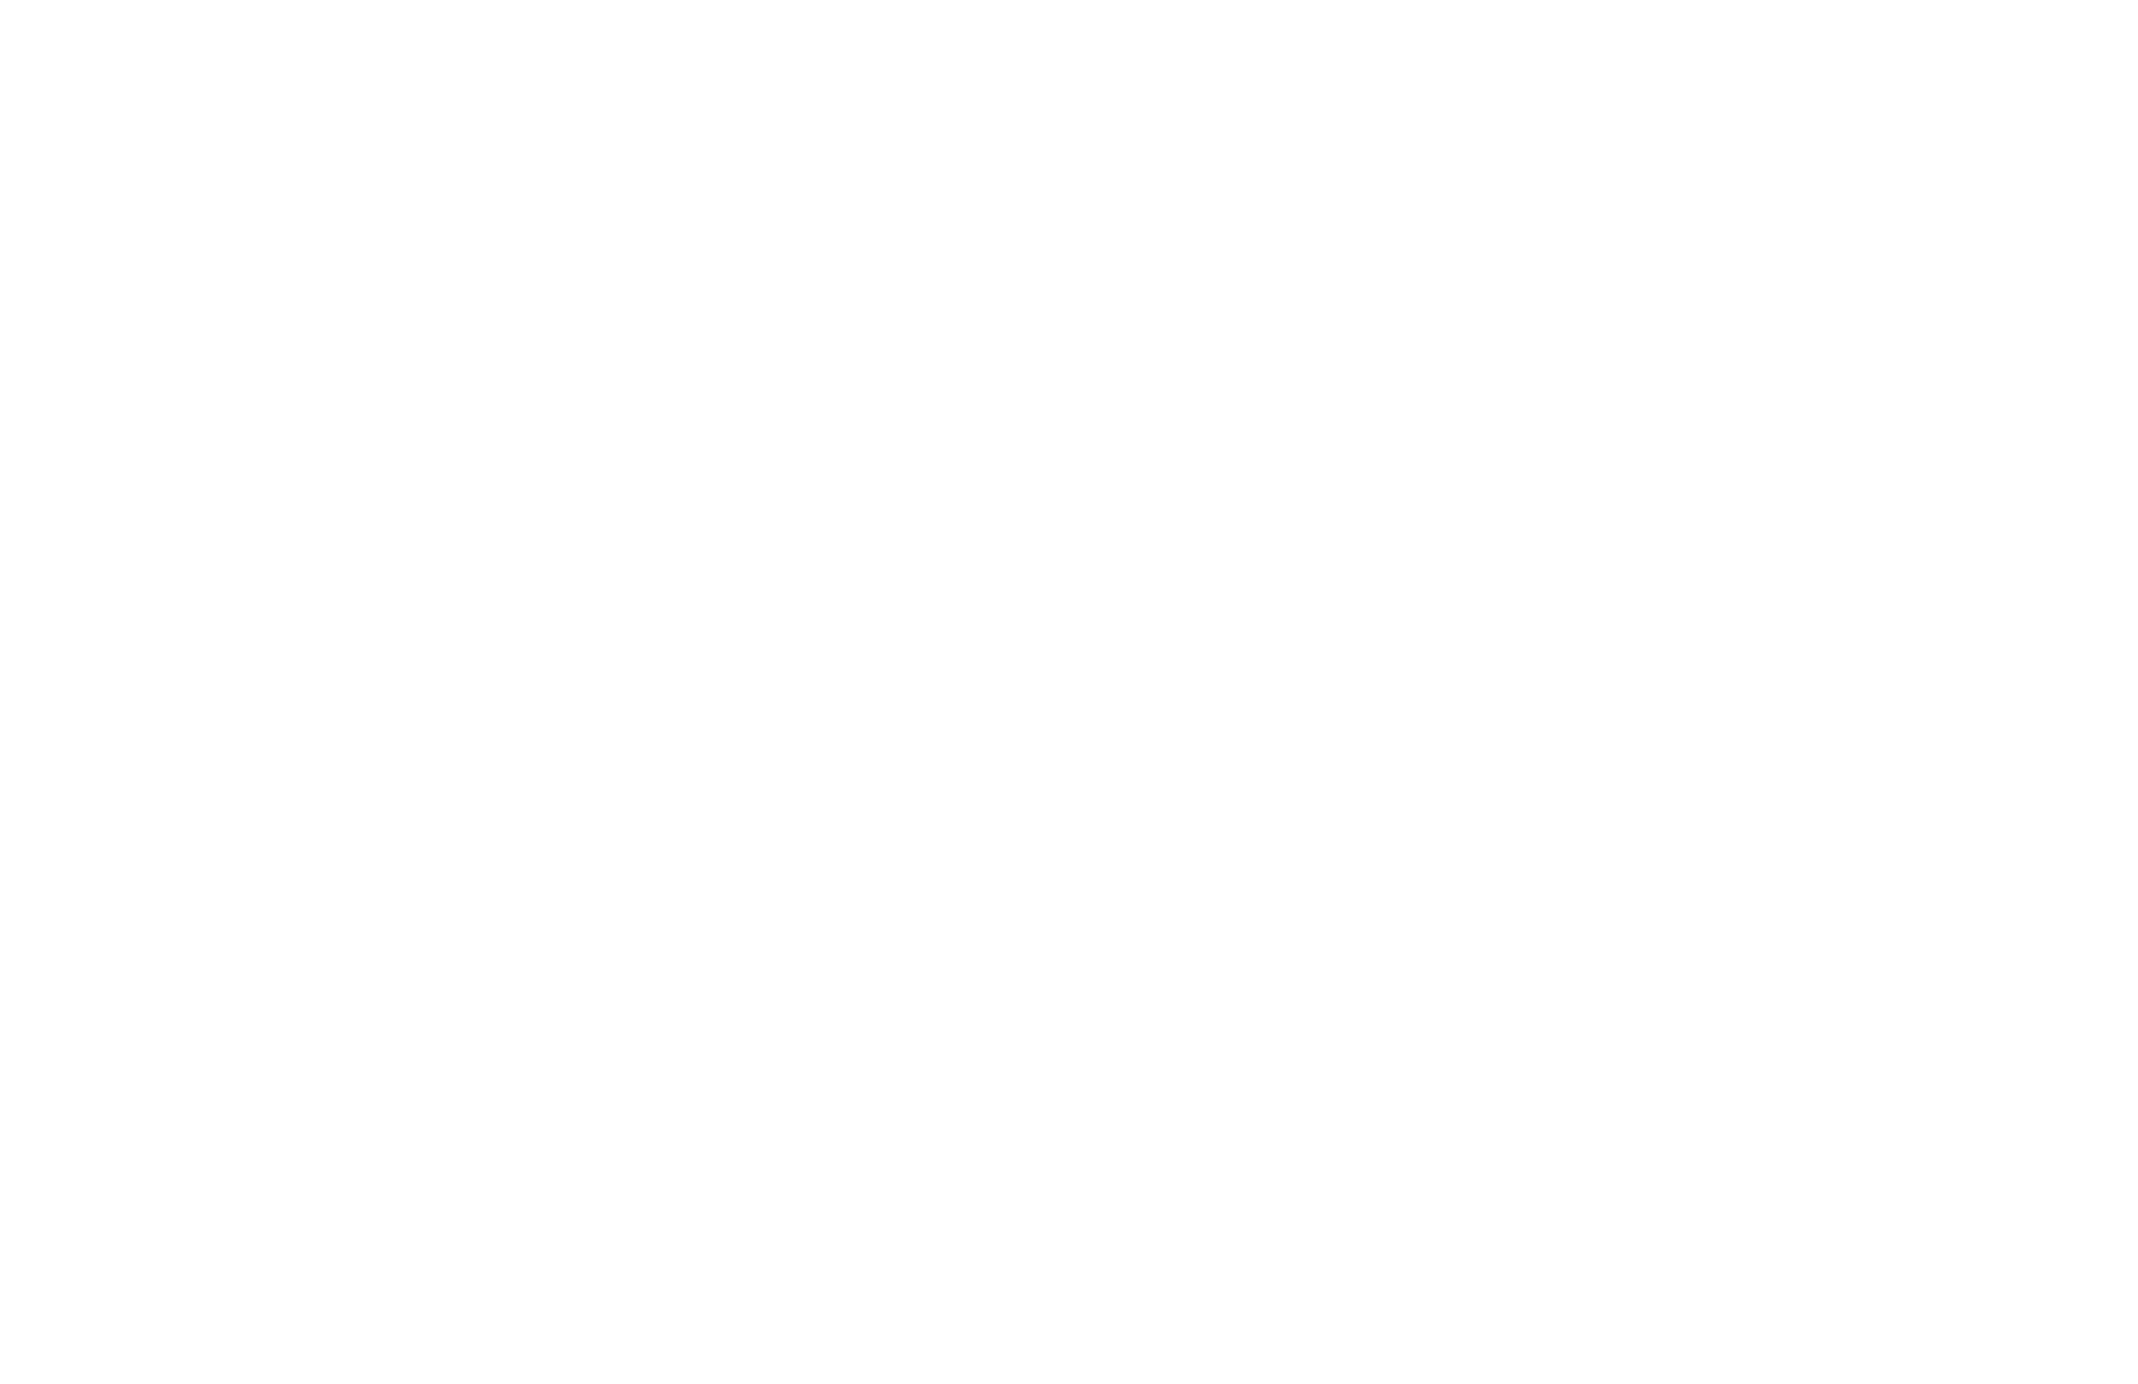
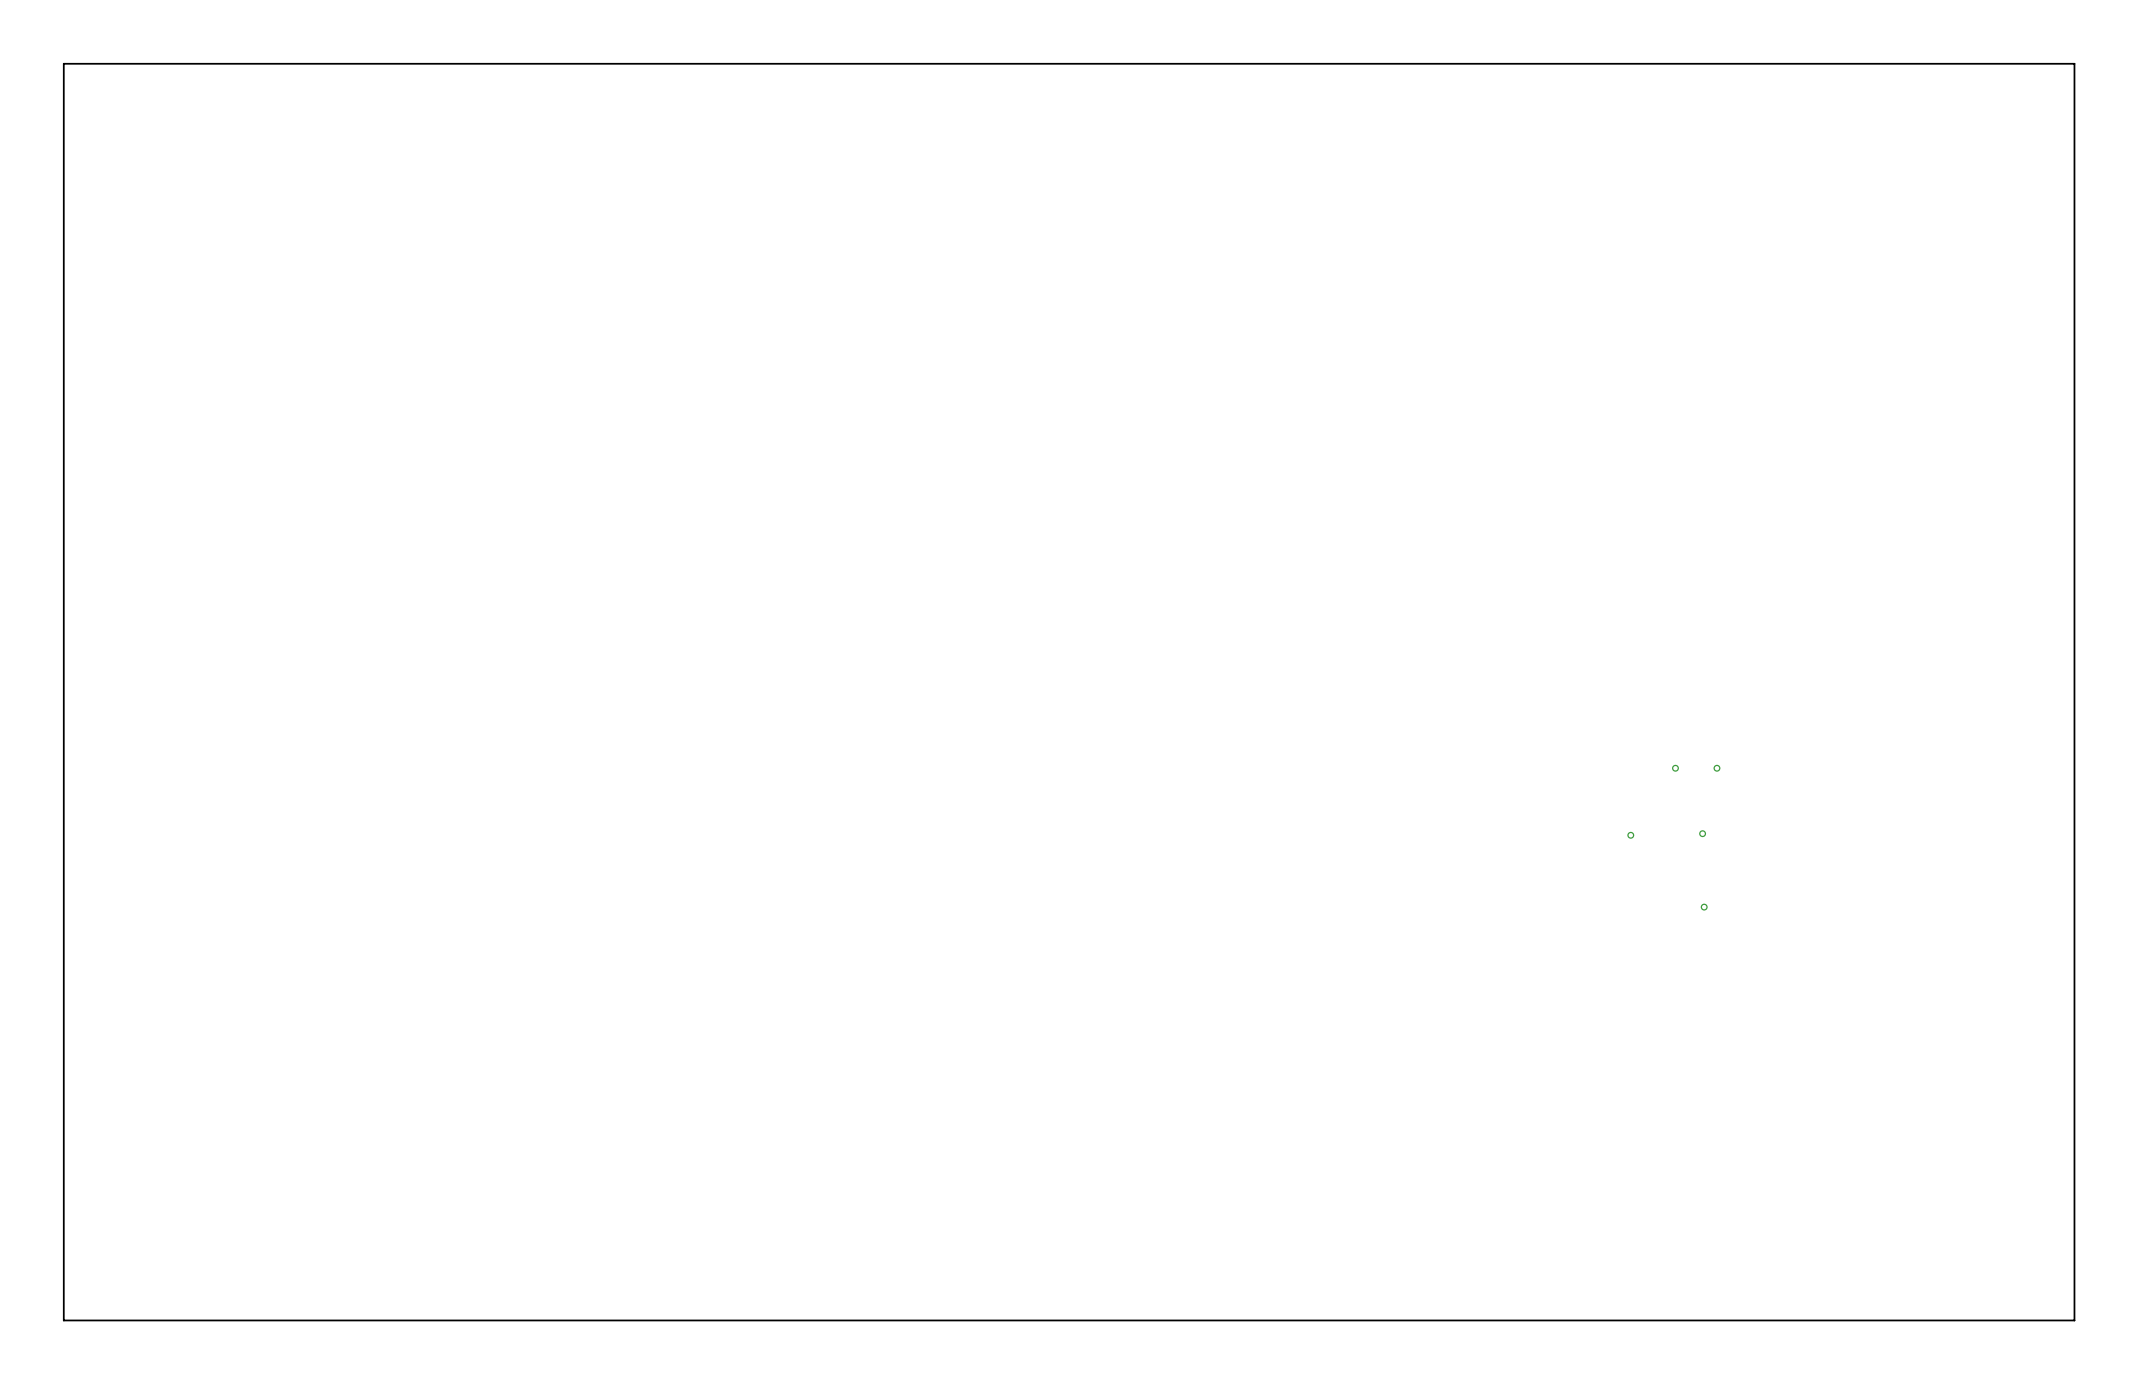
board edge: none -> (2074, 63) (63, 63) (63, 1320) (2074, 1320) (2074, 63)
via: none -> (1675, 768)
via: none -> (1716, 768)
via: none -> (1702, 833)
via: none -> (1630, 835)
via: none -> (1704, 907)

